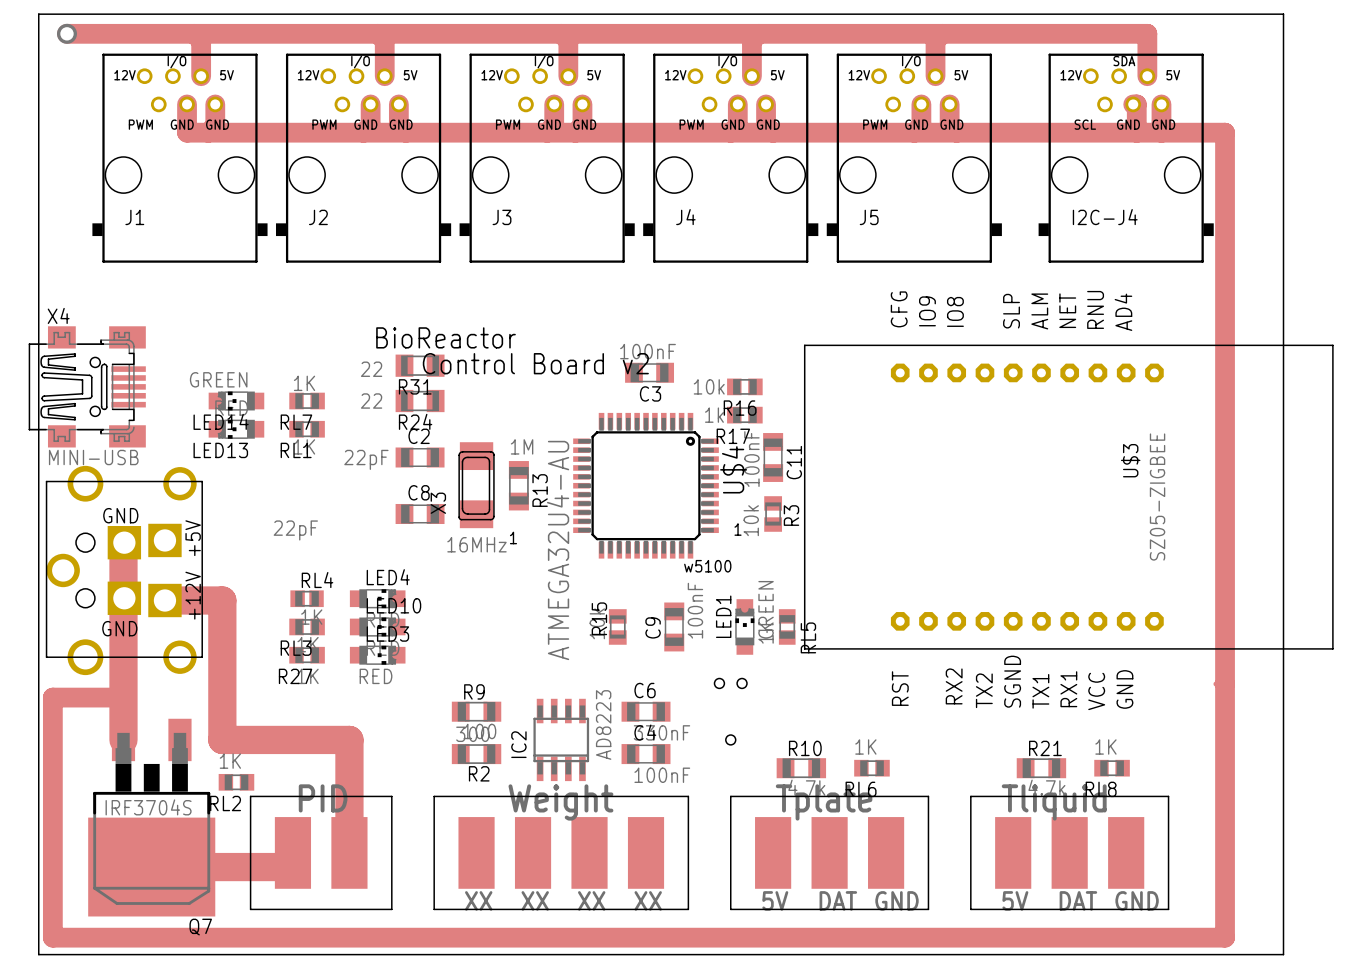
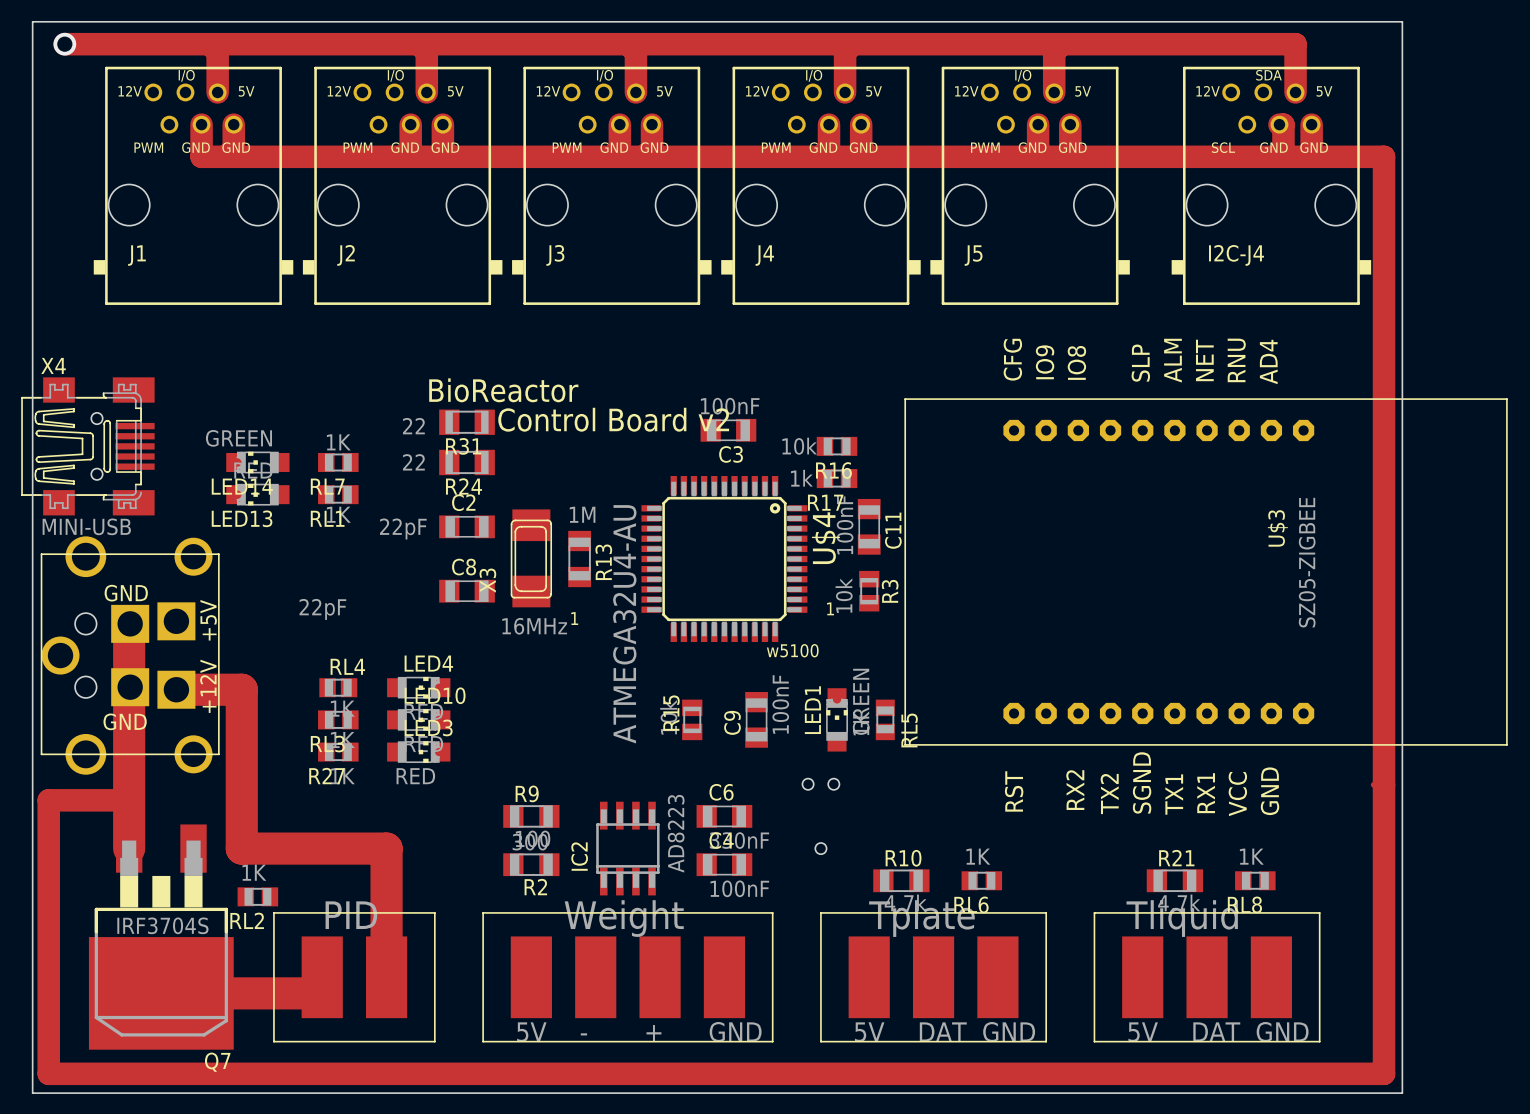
board edge: (1241, 14) (1283, 14) (1283, 954) (1241, 954) -> (1402, 21) (1402, 1093)
text: XX (478, 900) -> 5V (531, 1032)
text: XX (535, 900) -> - (583, 1034)
text: XX (591, 900) -> + (653, 1033)
text: XX (648, 900) -> GND (735, 1032)

